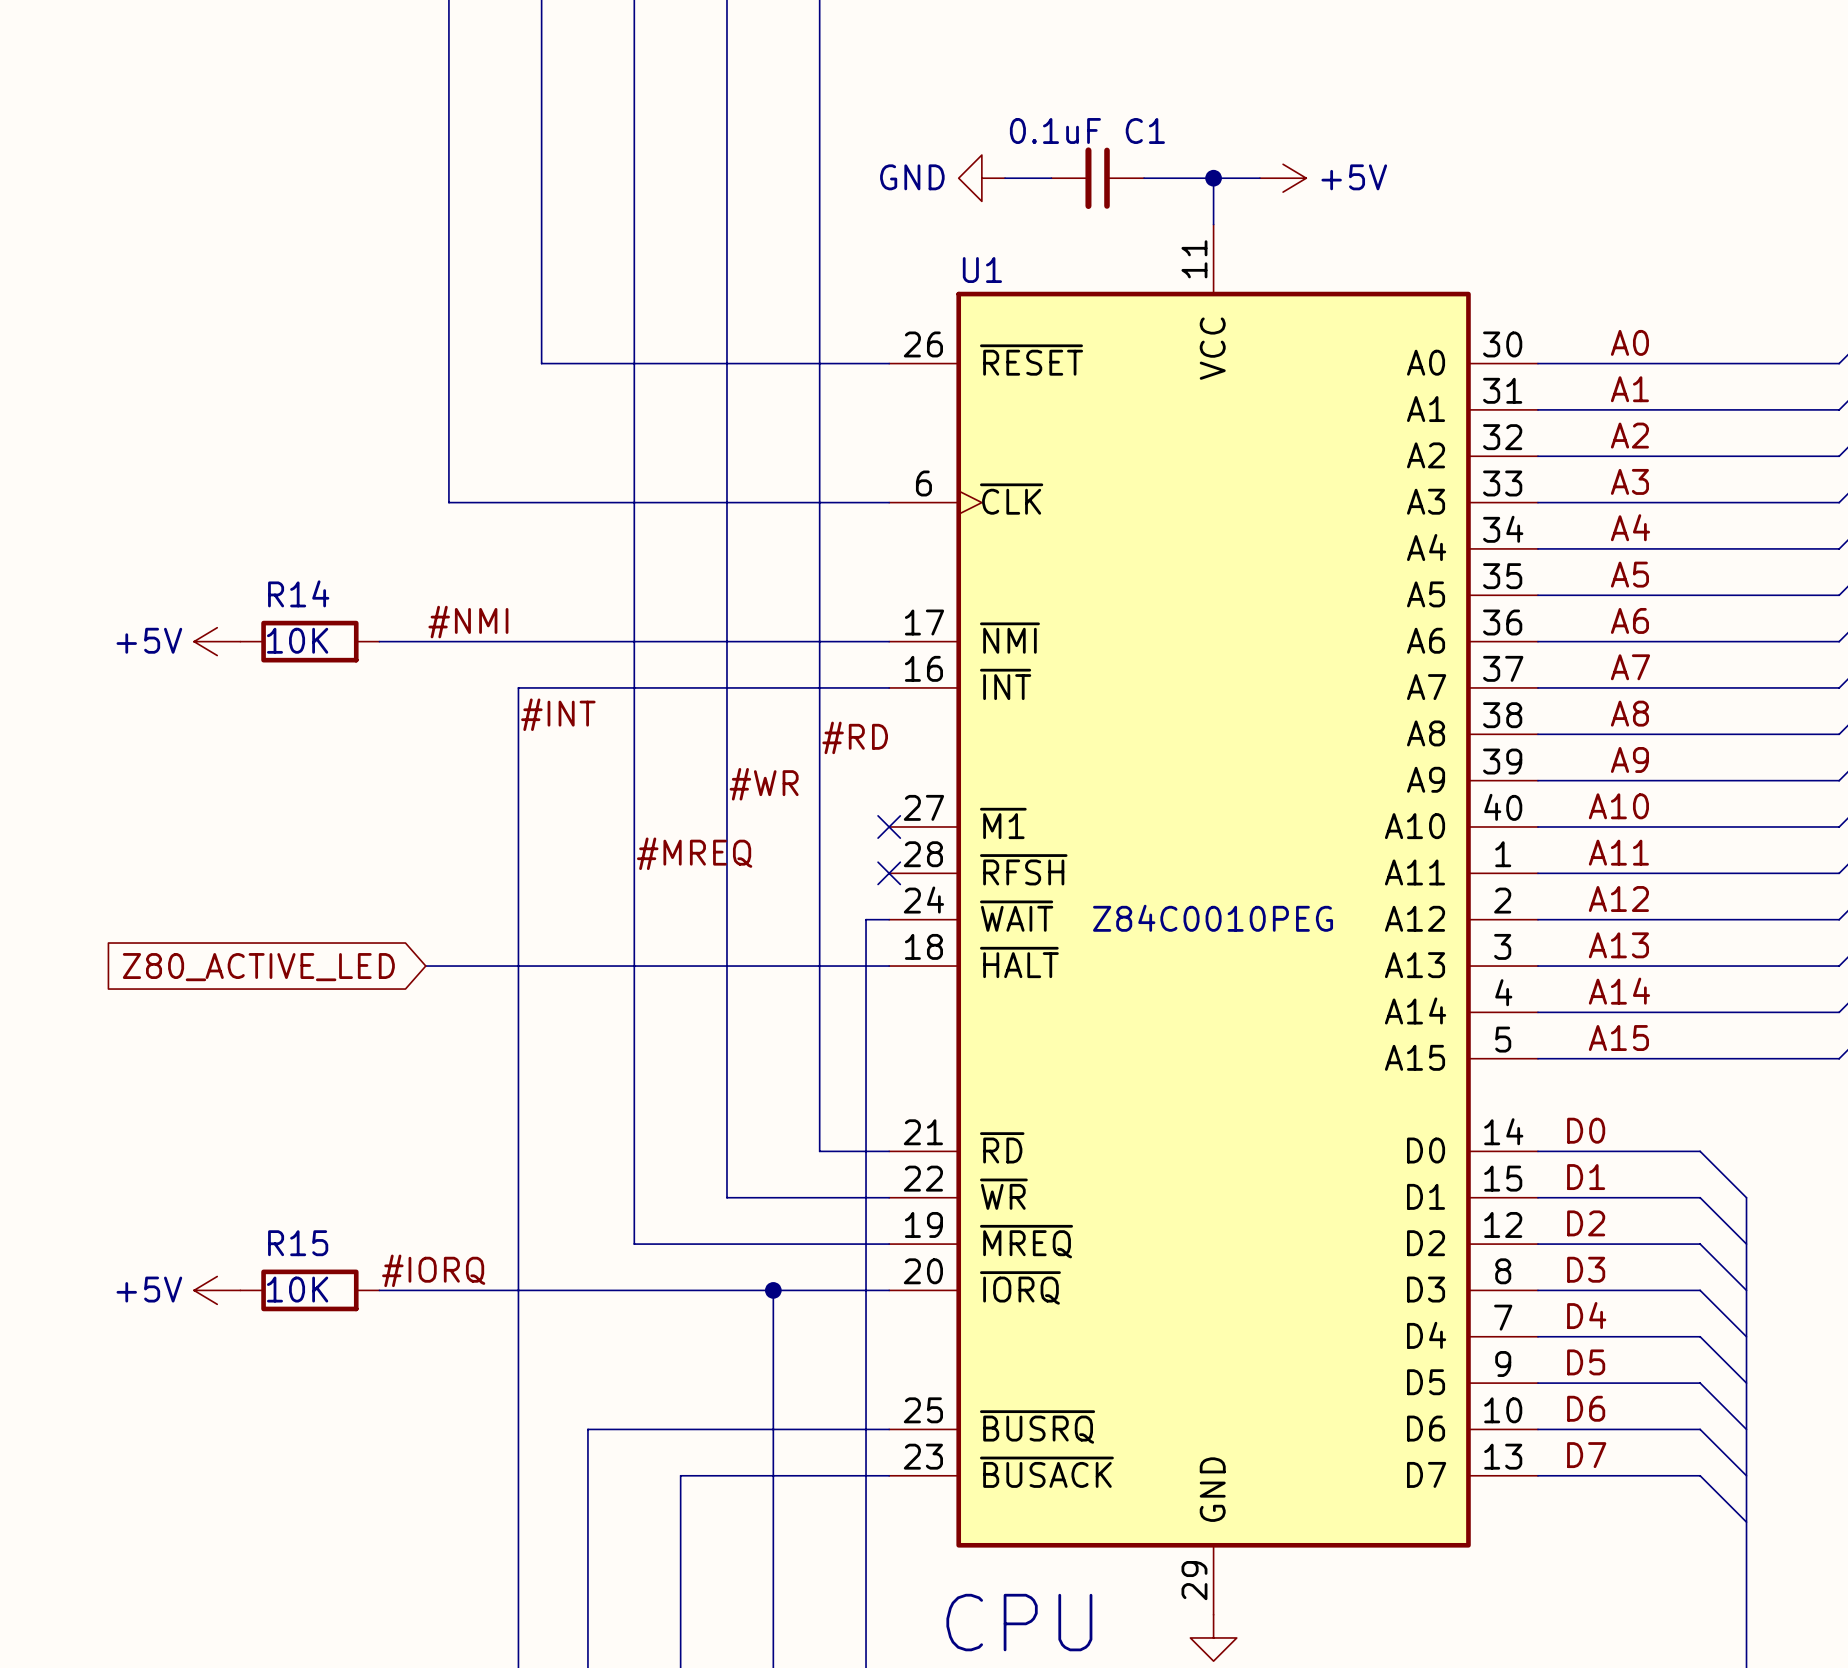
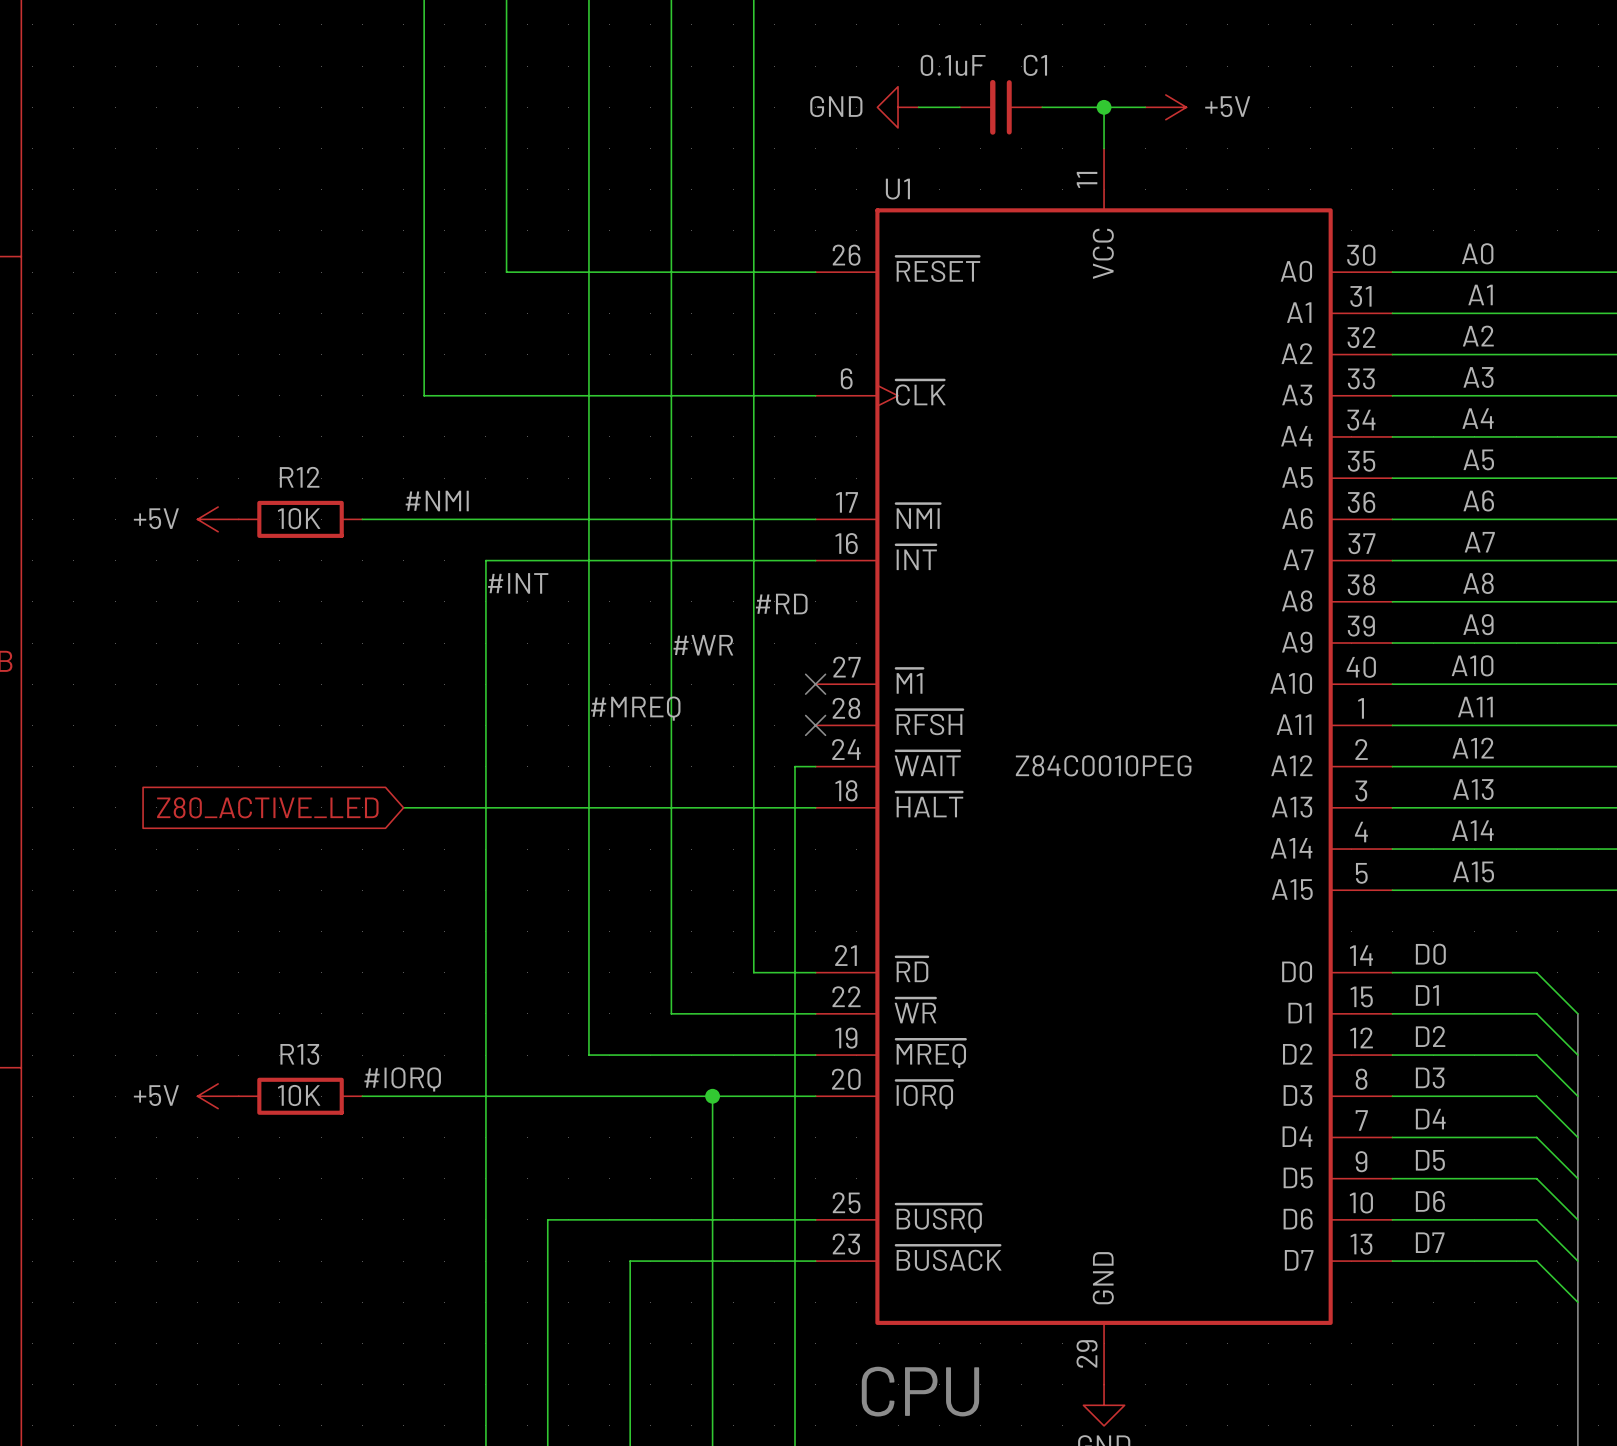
R14 name: R14 (298, 593) -> R12 (299, 477)
R15 name: R15 (298, 1243) -> R13 (299, 1054)

